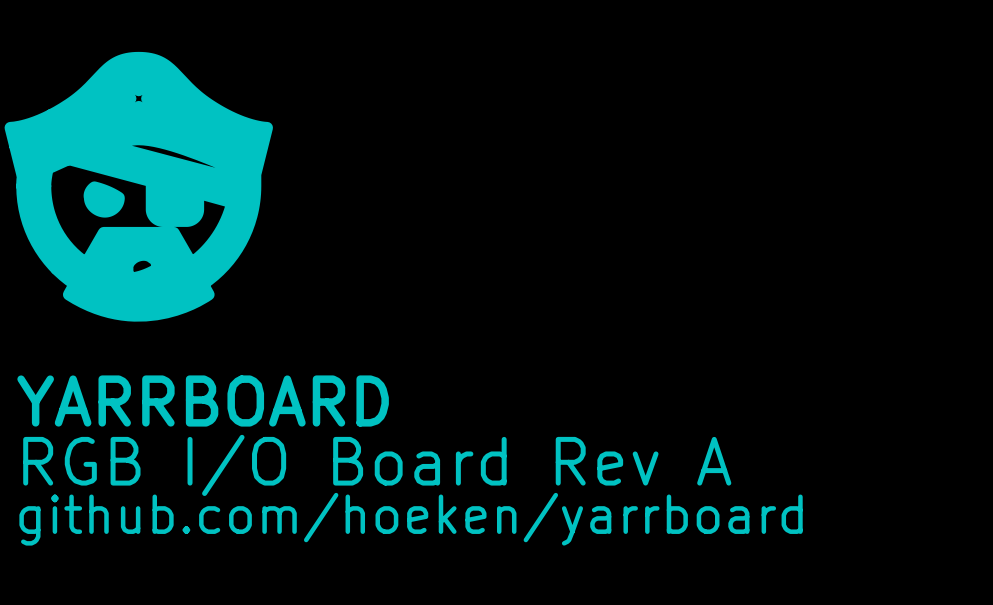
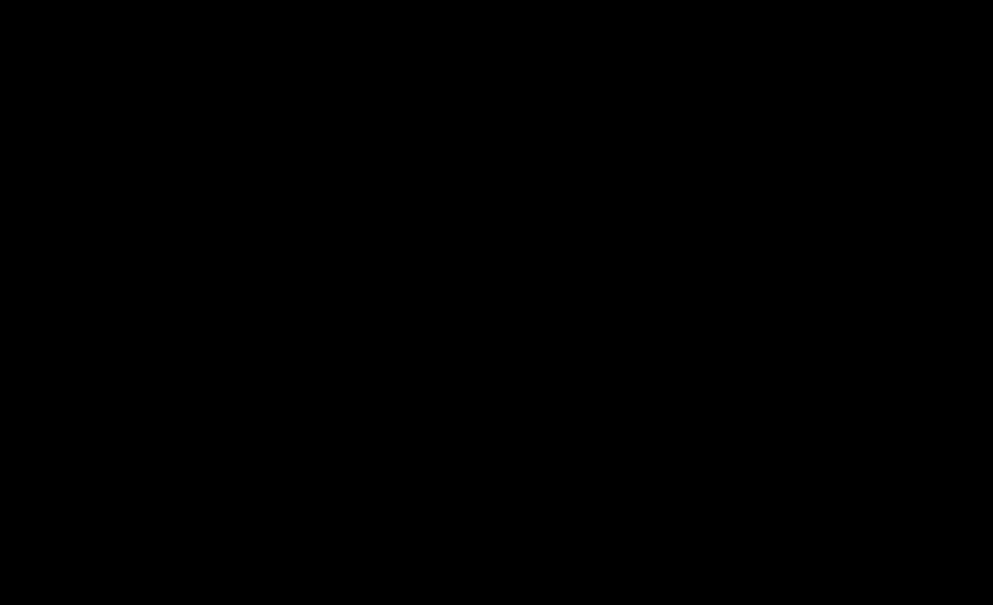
drawing: [4, 51, 273, 322] -> none
text: YARRBOARD (203, 401) -> none
text: RGB I/O Board Rev A (377, 465) -> none
text: github.com/hoeken/yarrboard (411, 519) -> none

